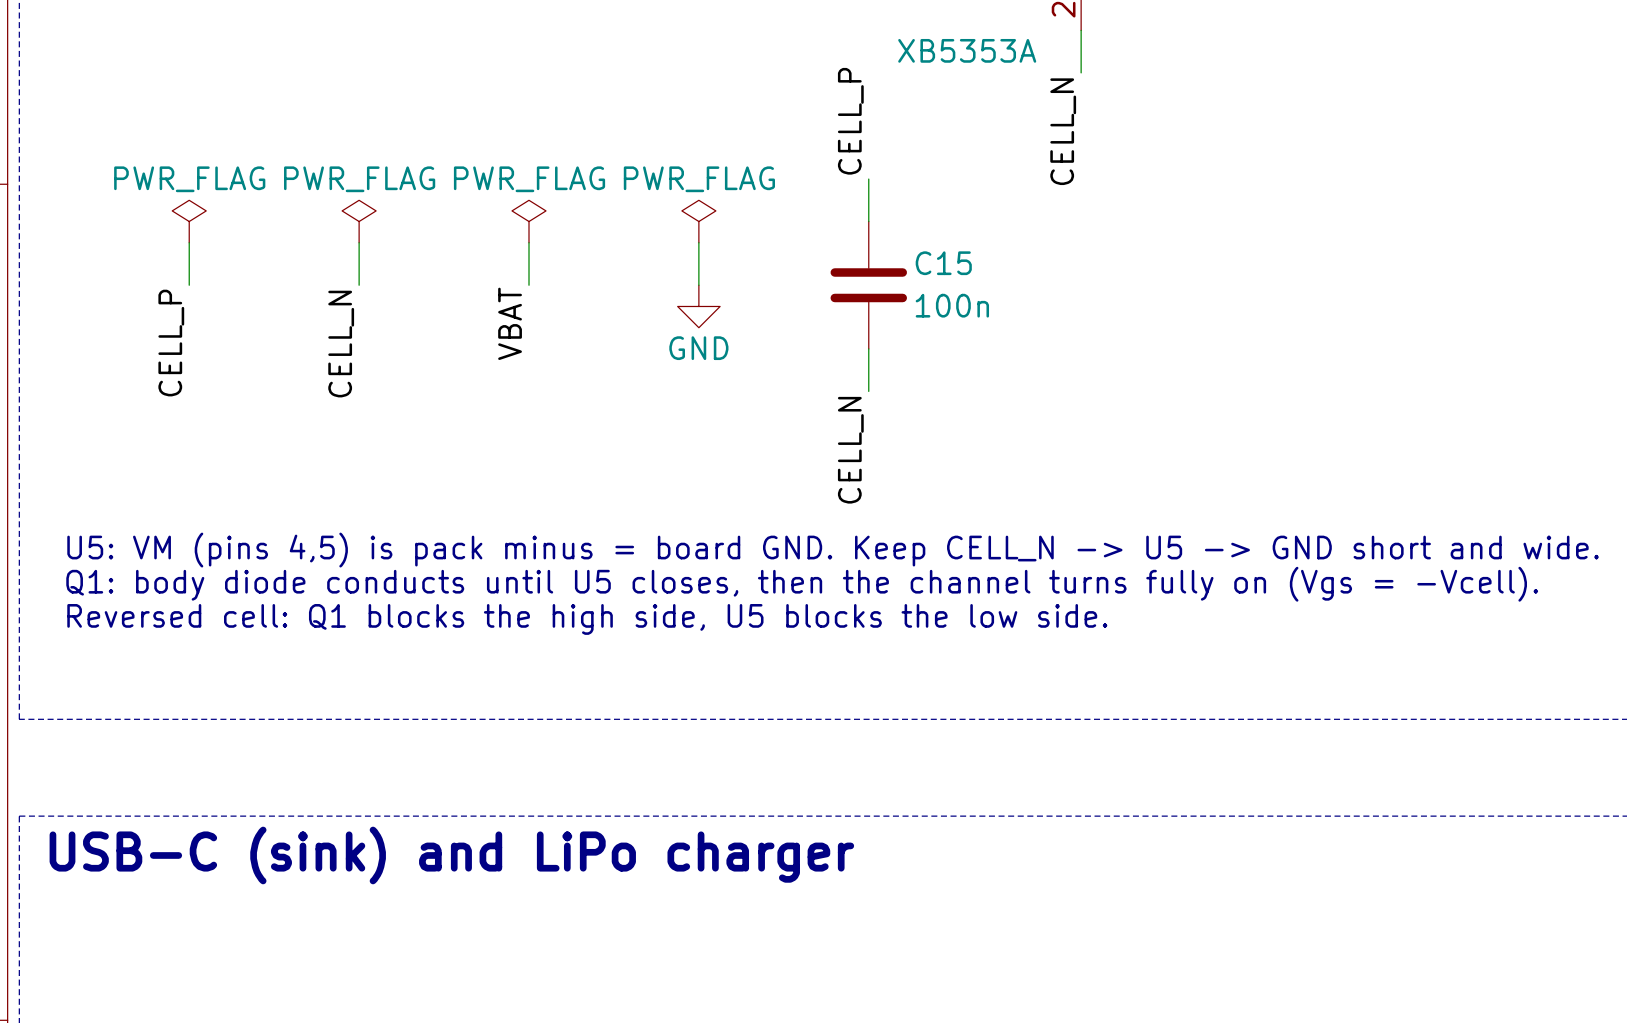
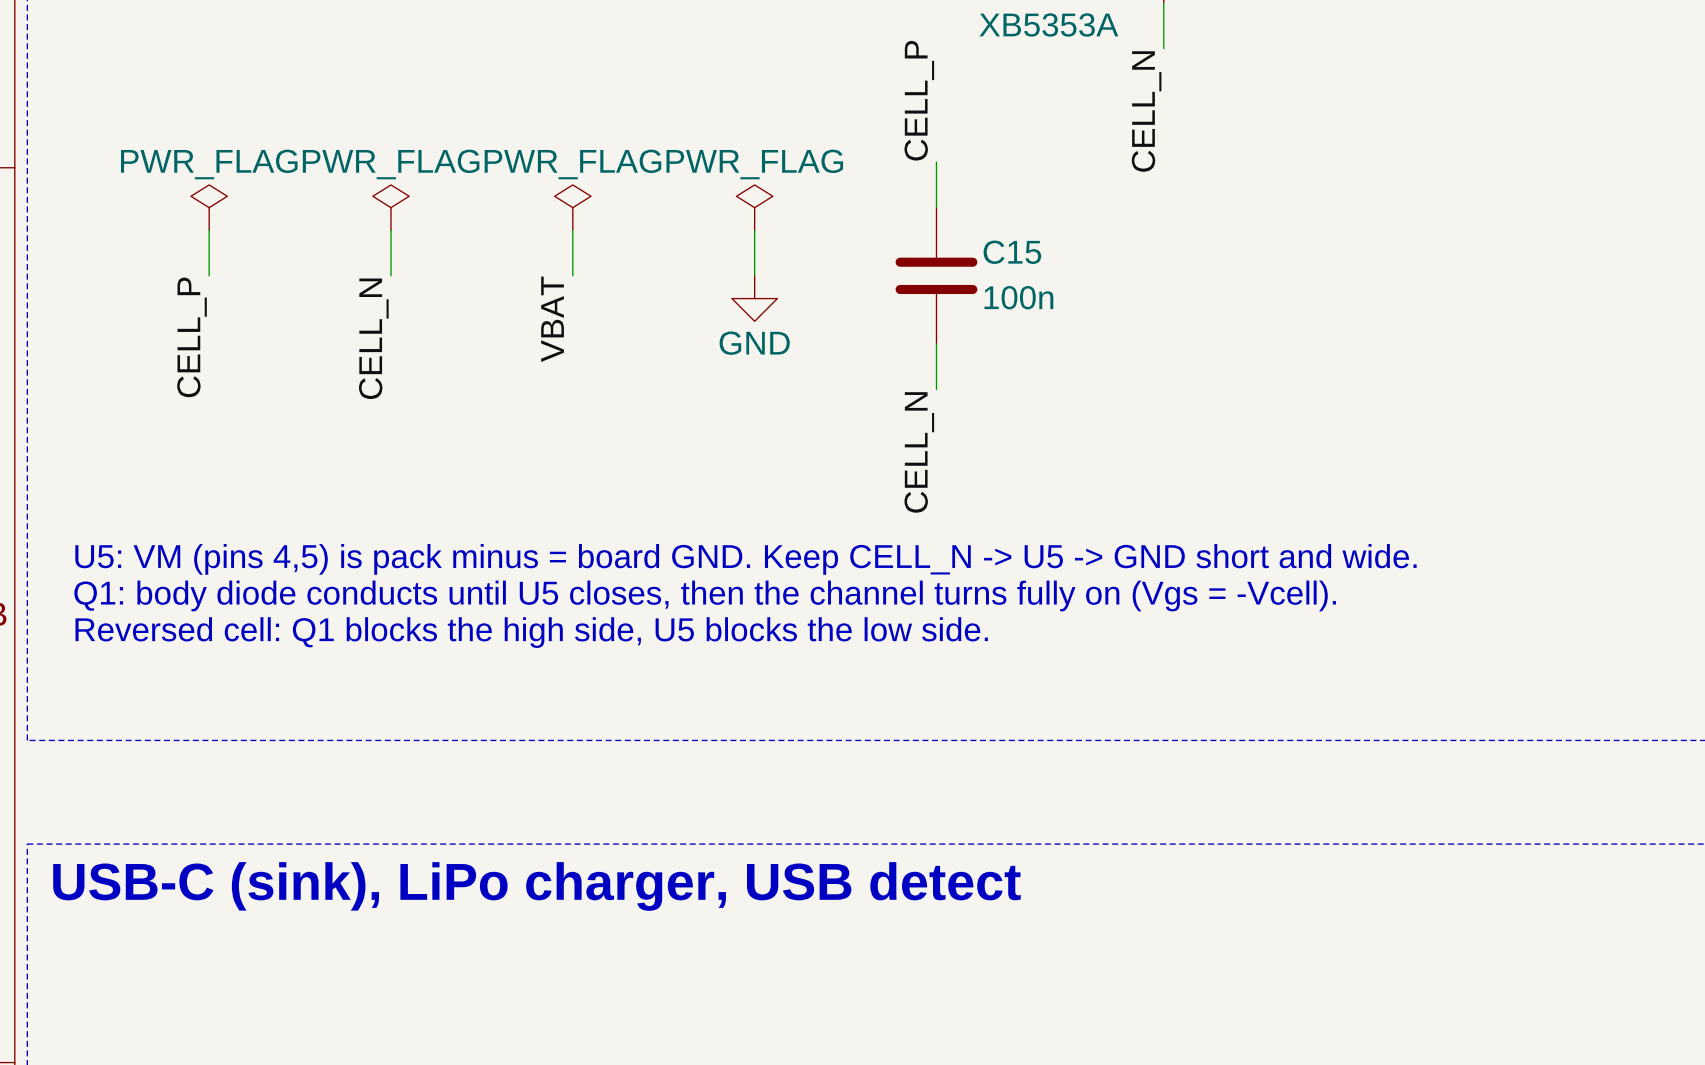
text: USB-C (sink) and LiPo charger (451, 855) -> USB-C (sink), LiPo charger, USB detect (536, 886)

